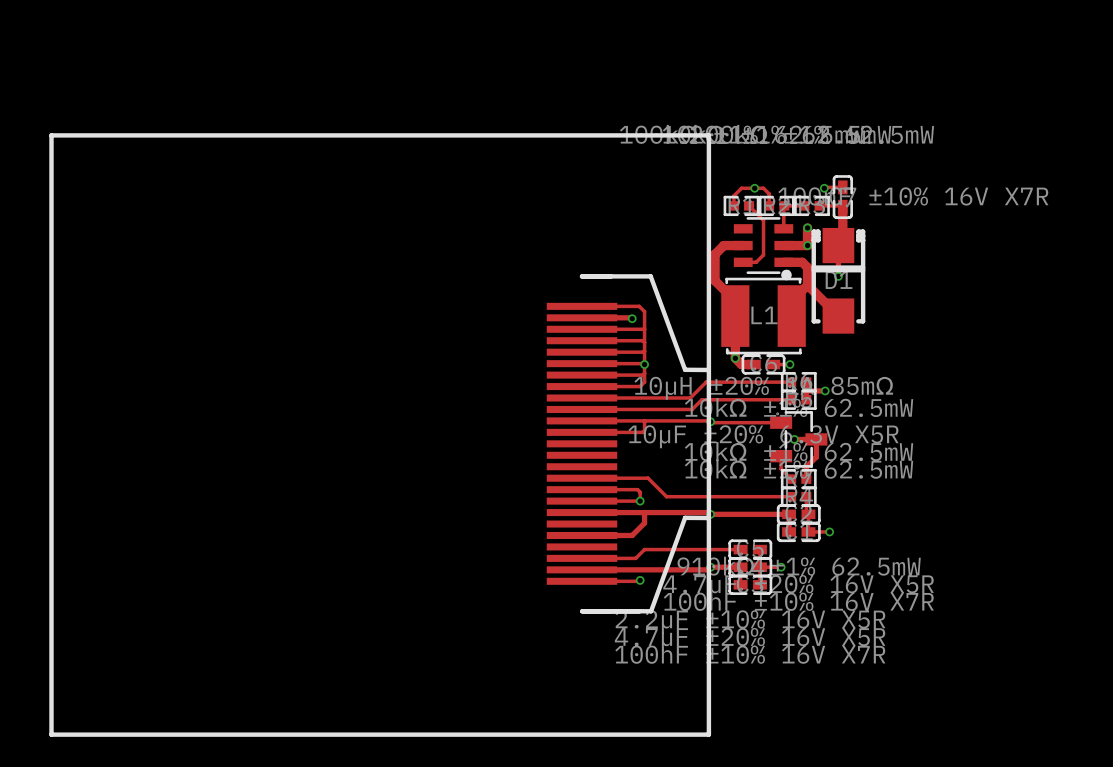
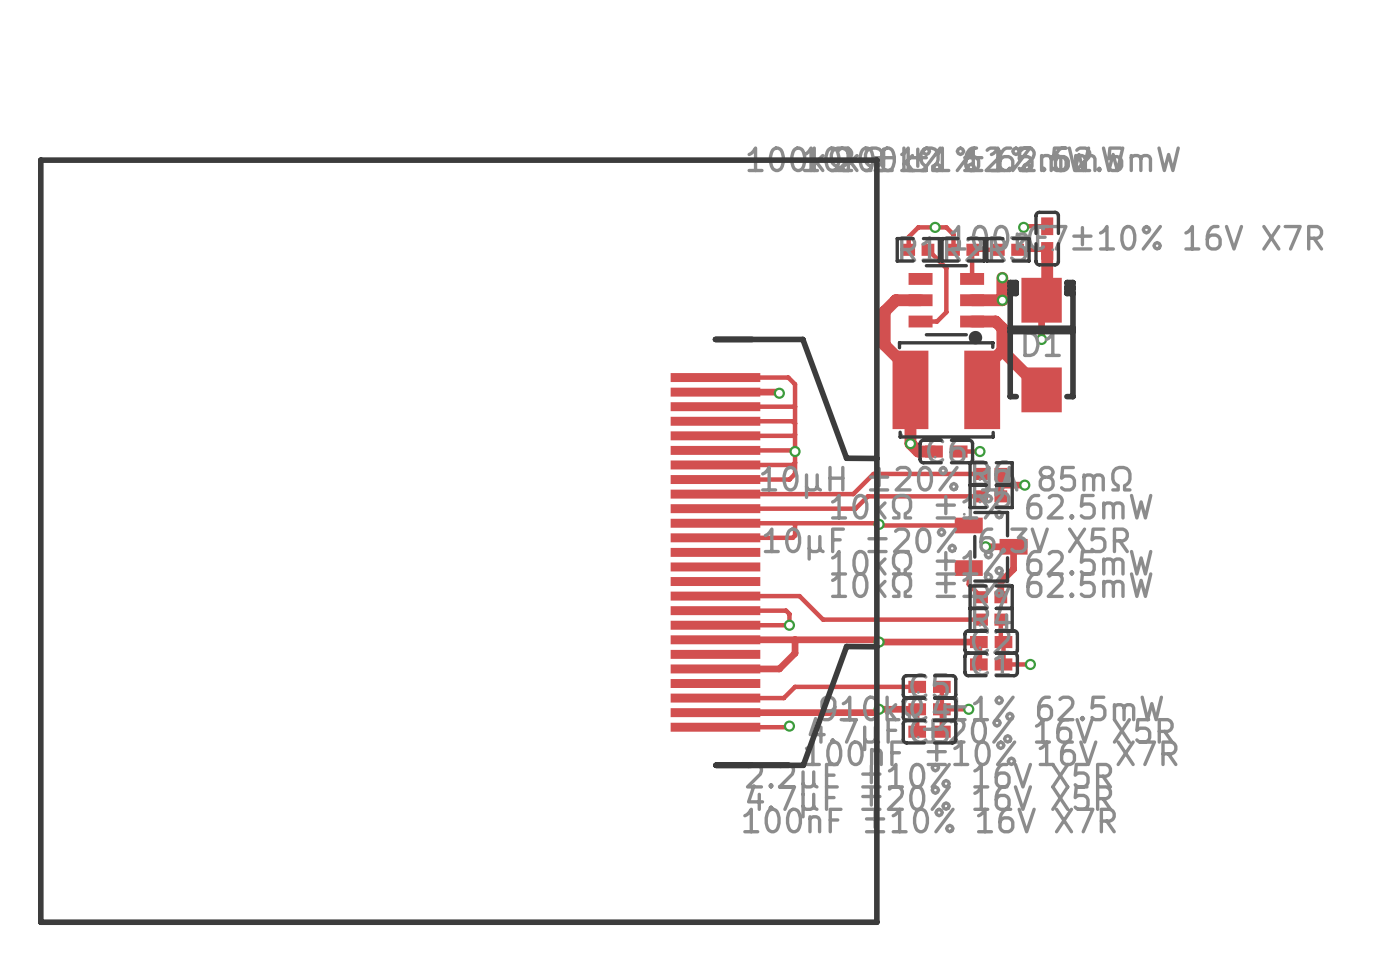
L1 name: L1 (764, 315) -> none

